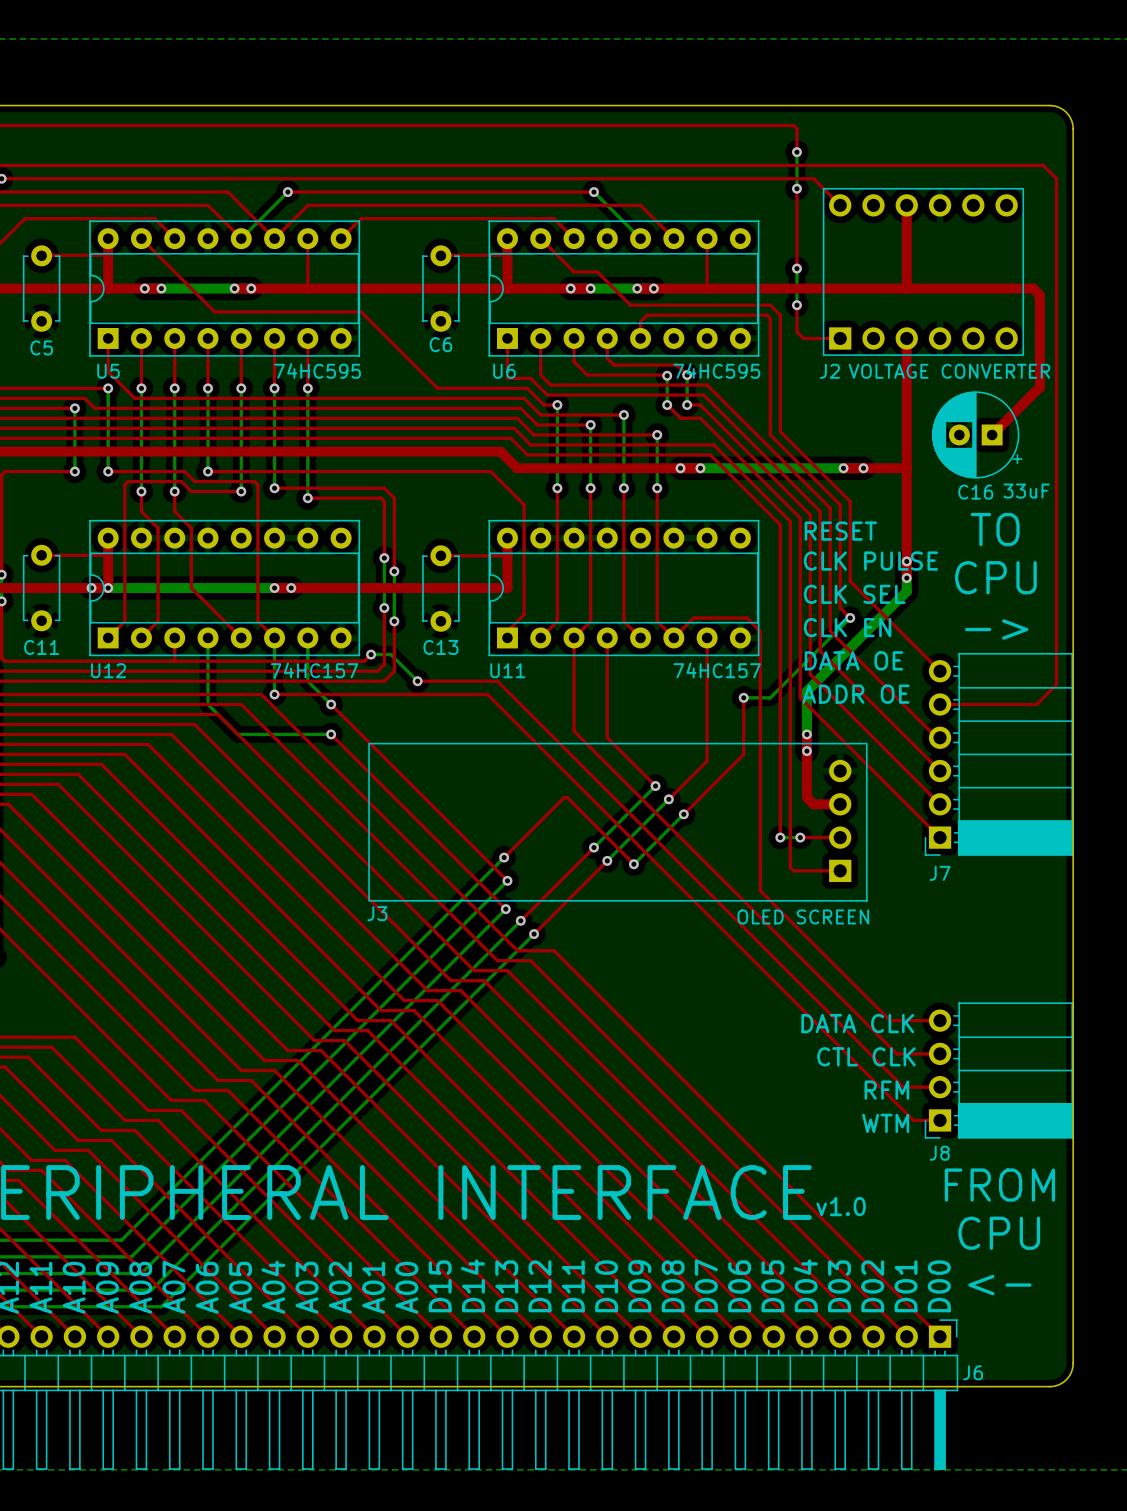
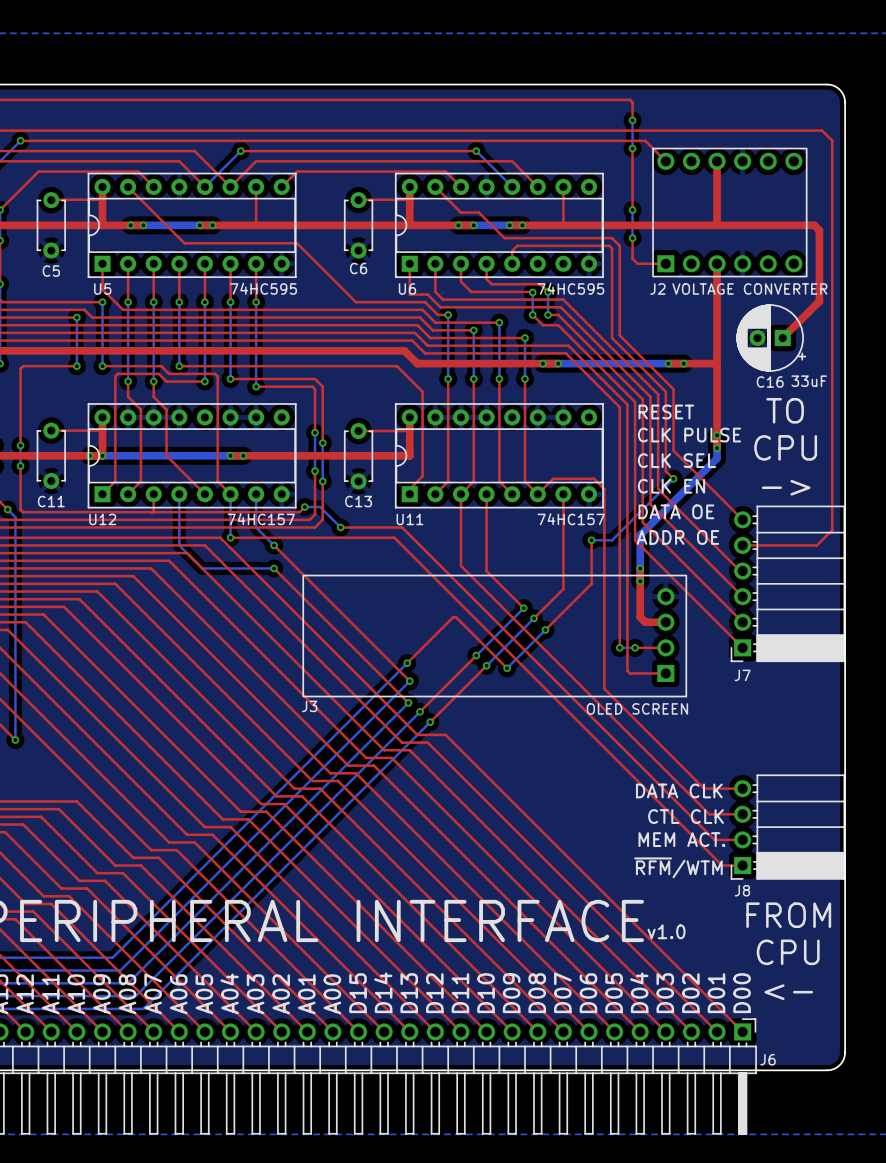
text: none -> MEM ACT. (681, 839)
text: RFM (886, 1090) -> none
text: none -> ~{RFM}/WTM (678, 867)
text: WTM (885, 1123) -> none

